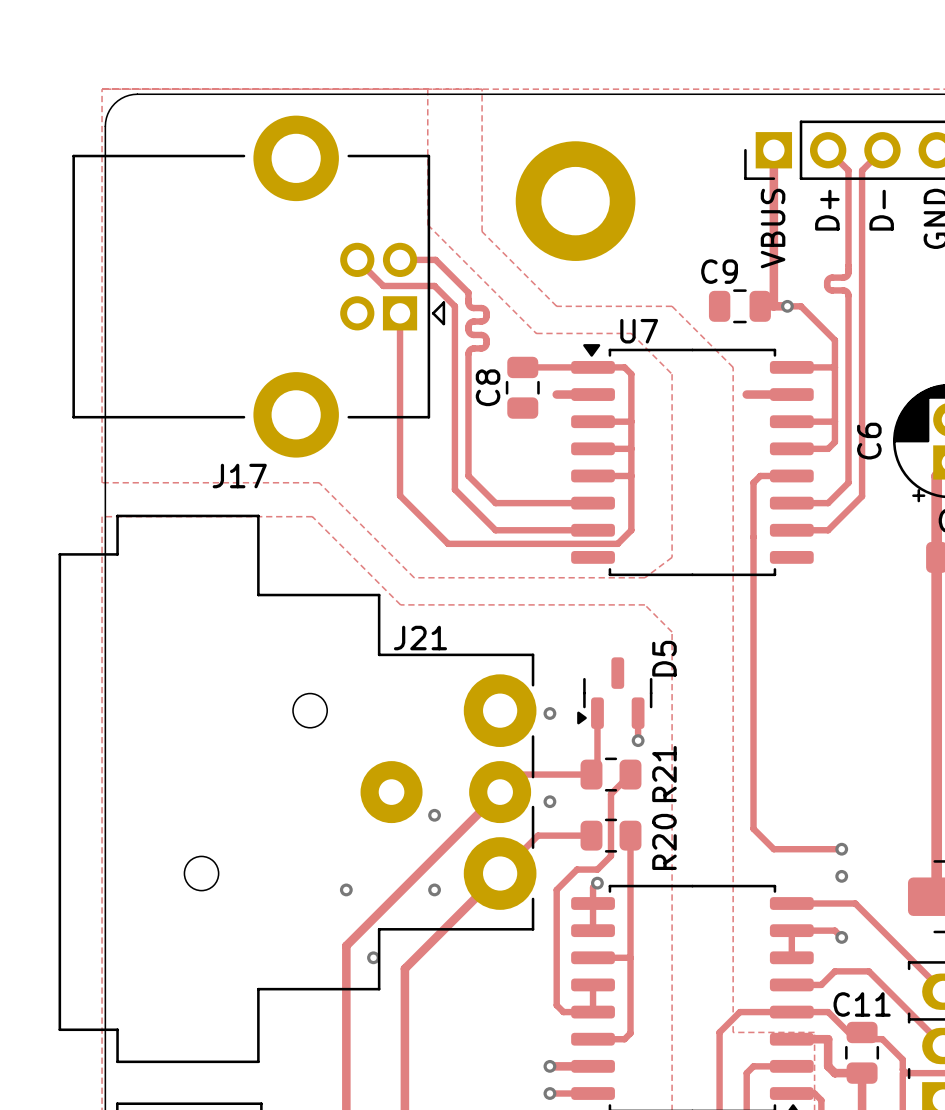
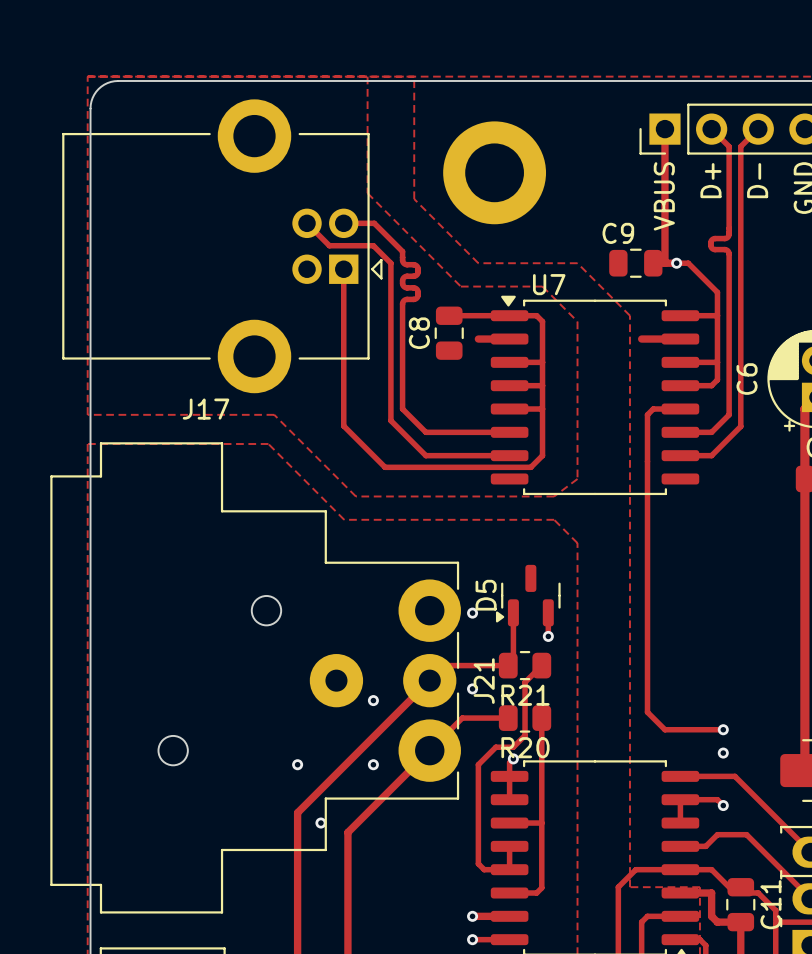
J21 name rotation: 0° (420, 638) -> 90° counterclockwise (484, 681)
J21 name position: J21 (420, 638) -> J21 (484, 681)
D5 name position: D5 (664, 658) -> D5 (486, 595)
R21 name rotation: 0° (664, 774) -> 90° clockwise (525, 695)
R20 name rotation: 0° (664, 841) -> 90° clockwise (525, 747)
C11 name rotation: 0° (862, 1004) -> 90° counterclockwise (770, 904)

